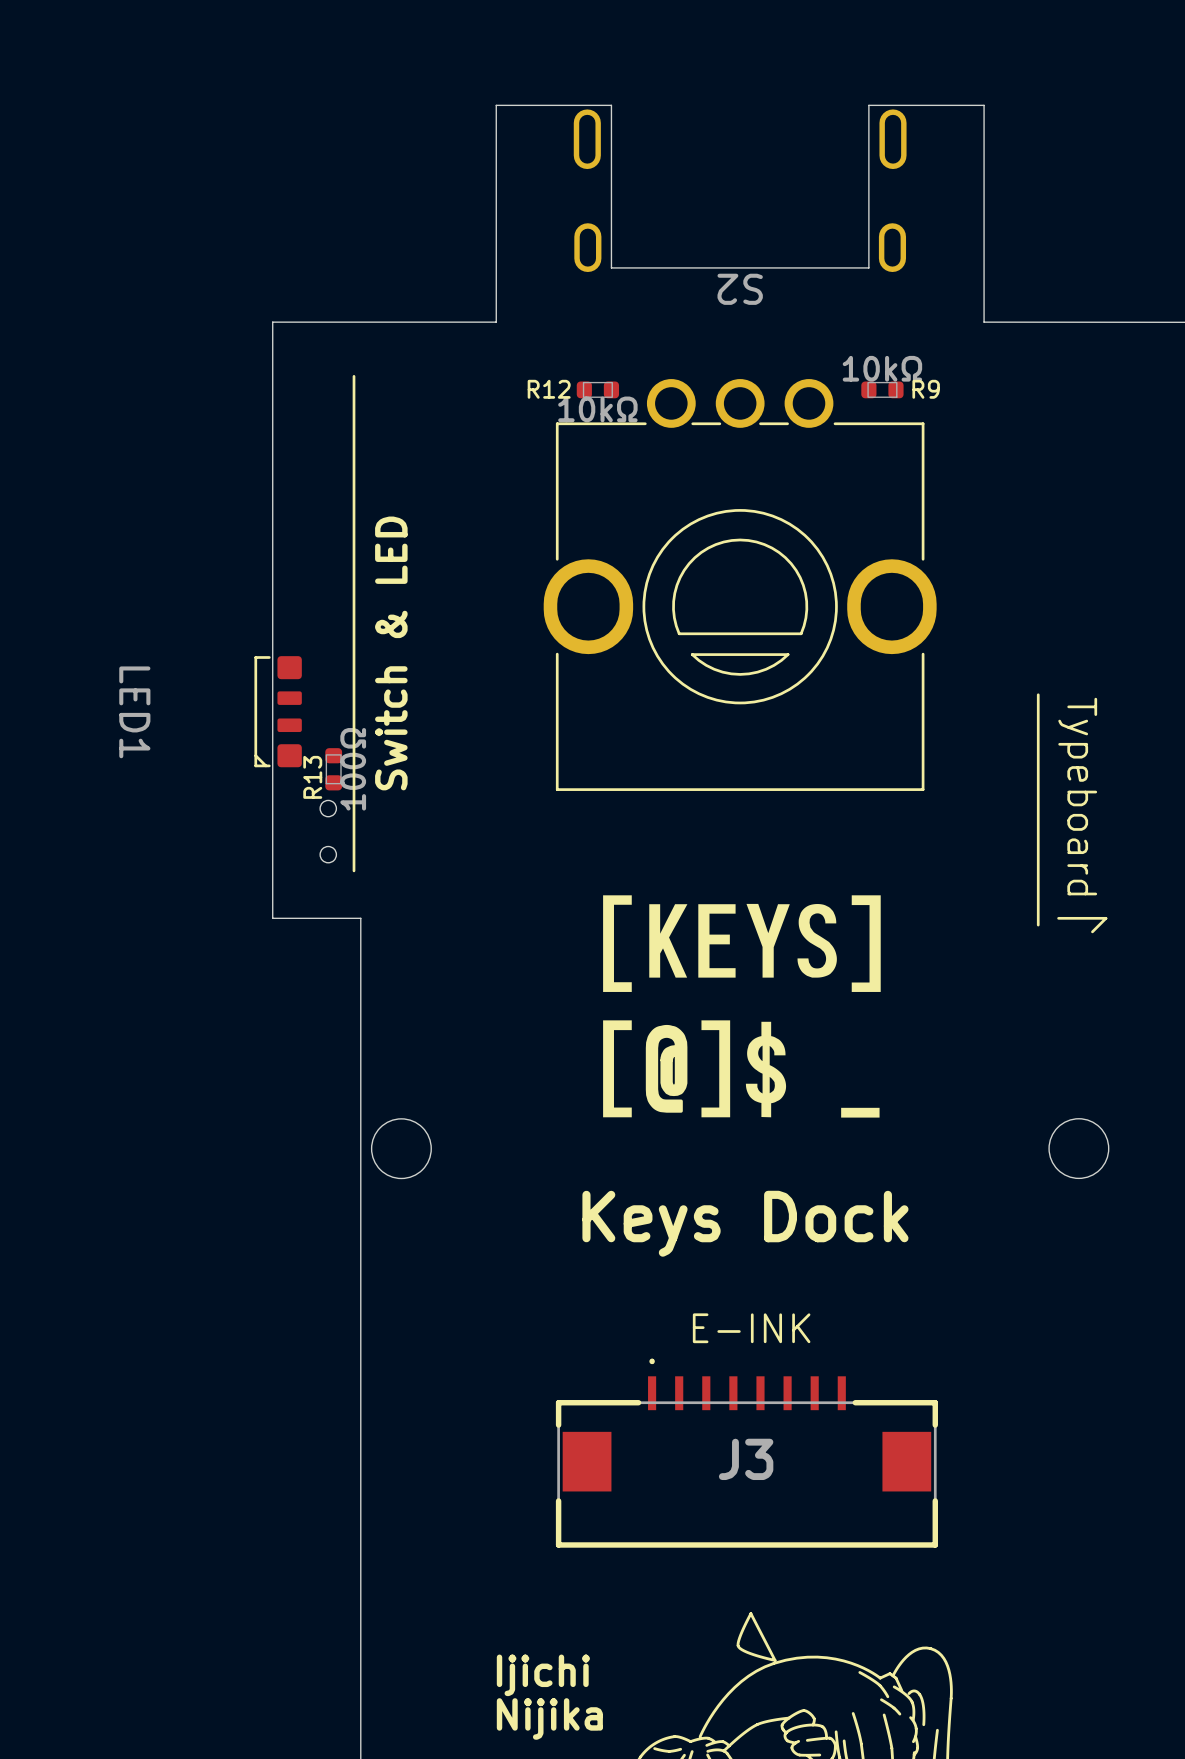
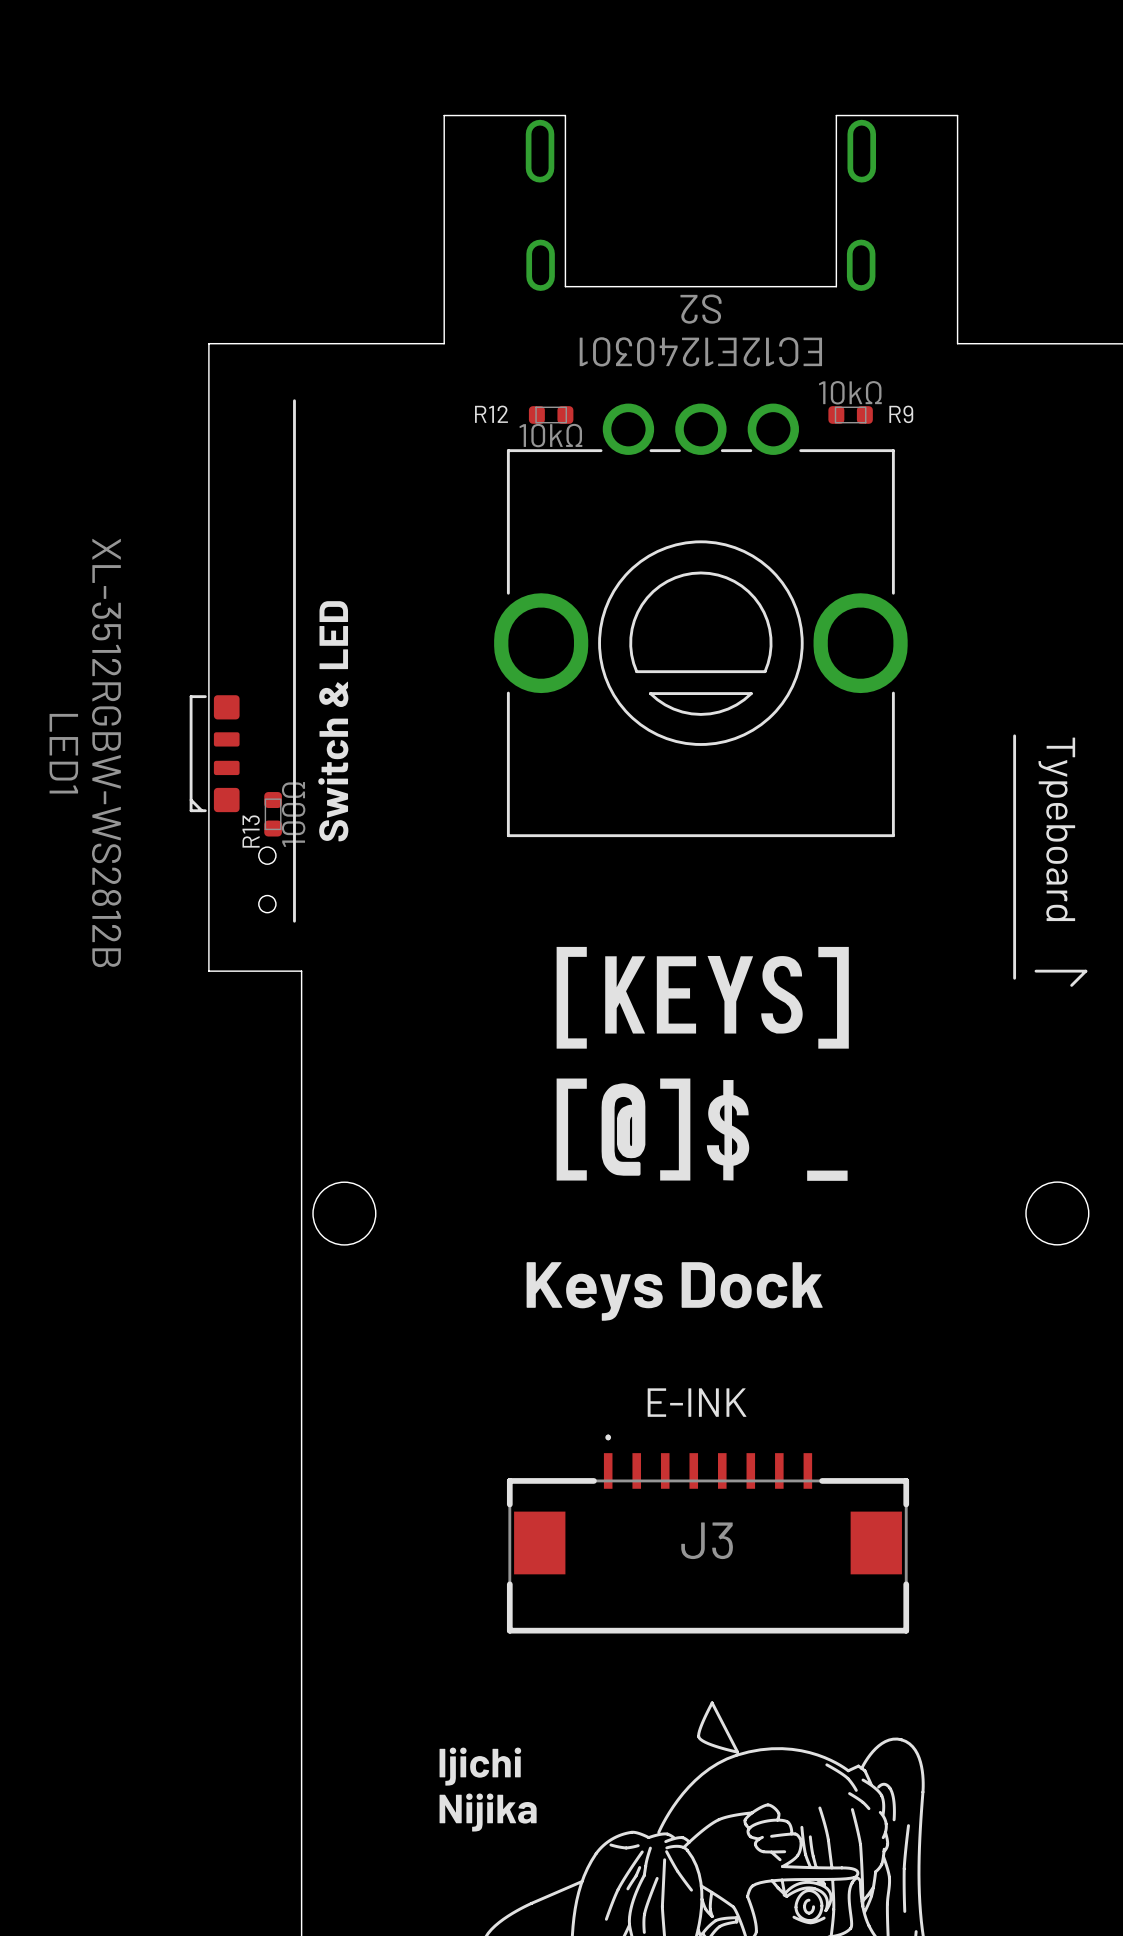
S2 value: none -> EC12E1240301 (700, 351)
LED1 value: none -> XL-3512RGBW-WS2812B (106, 752)

